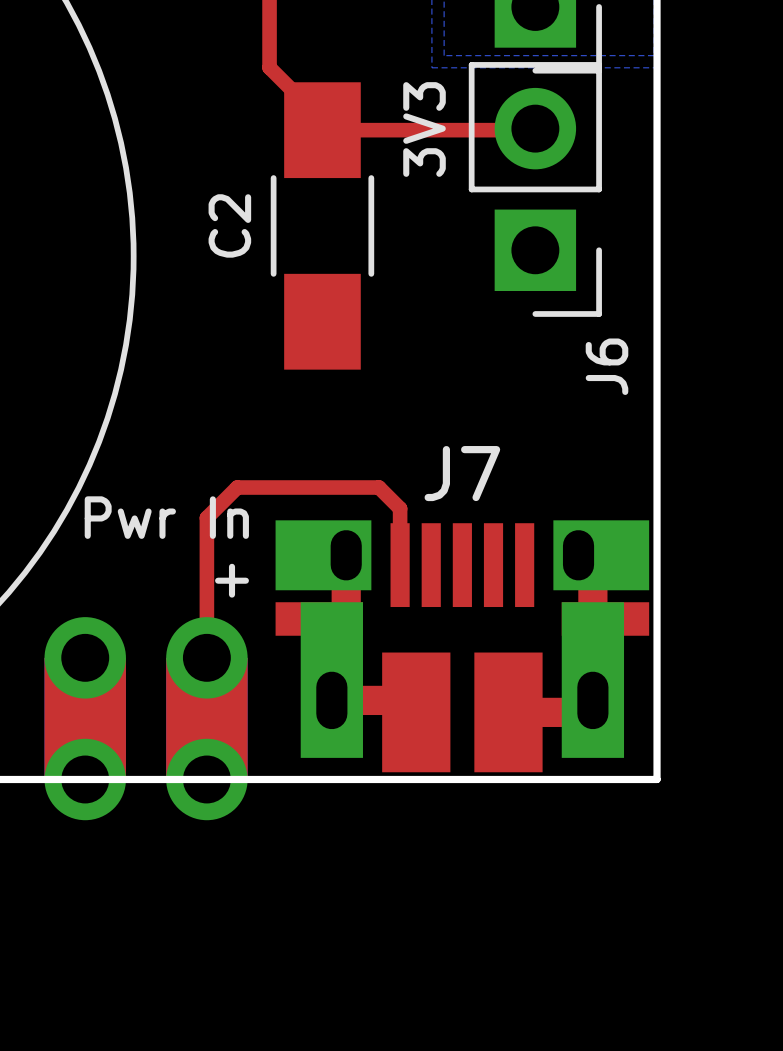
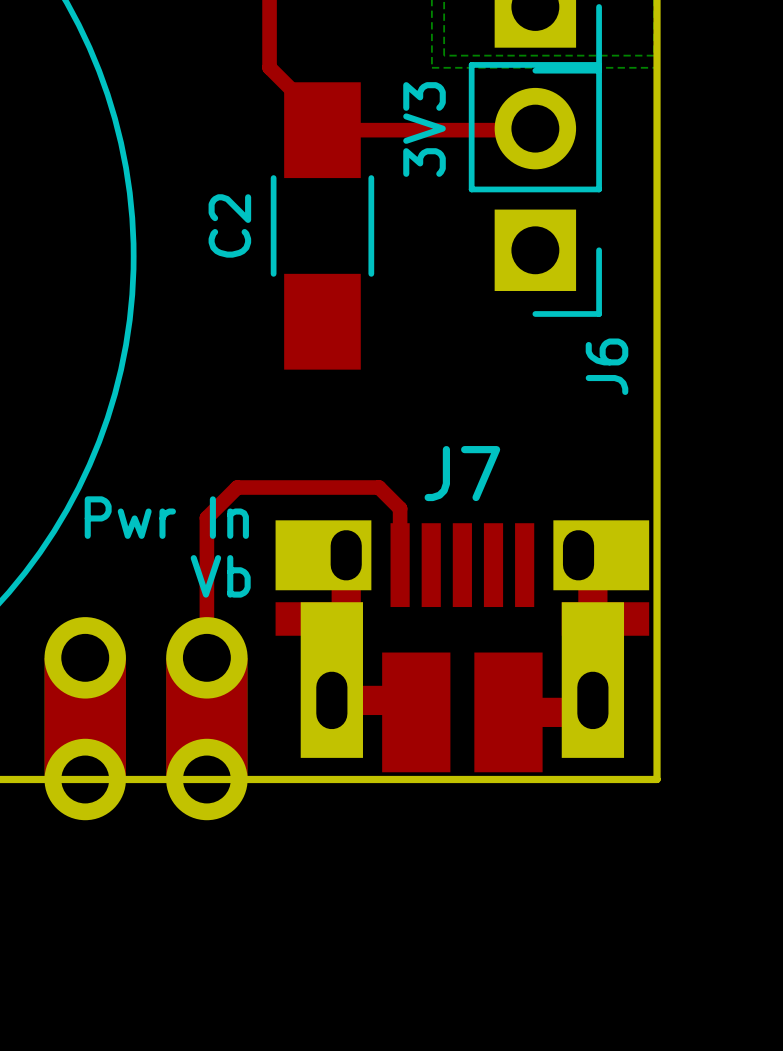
text: + (232, 580) -> Vb (220, 576)

